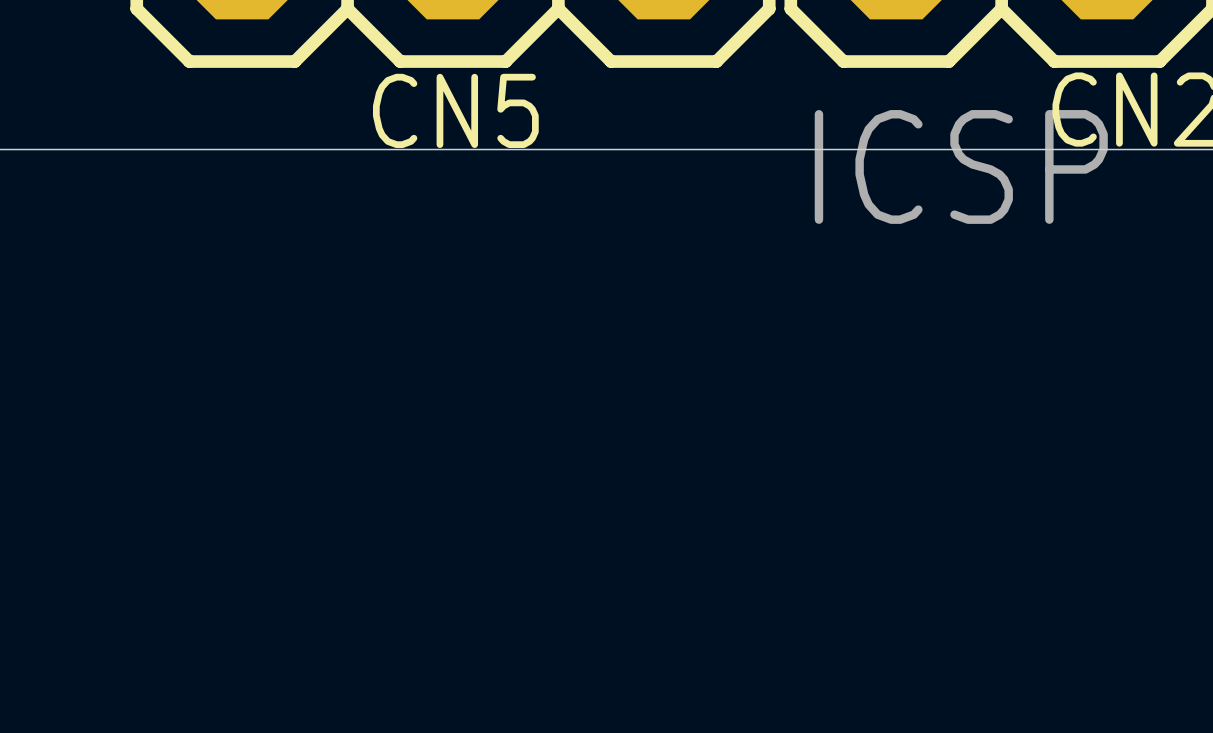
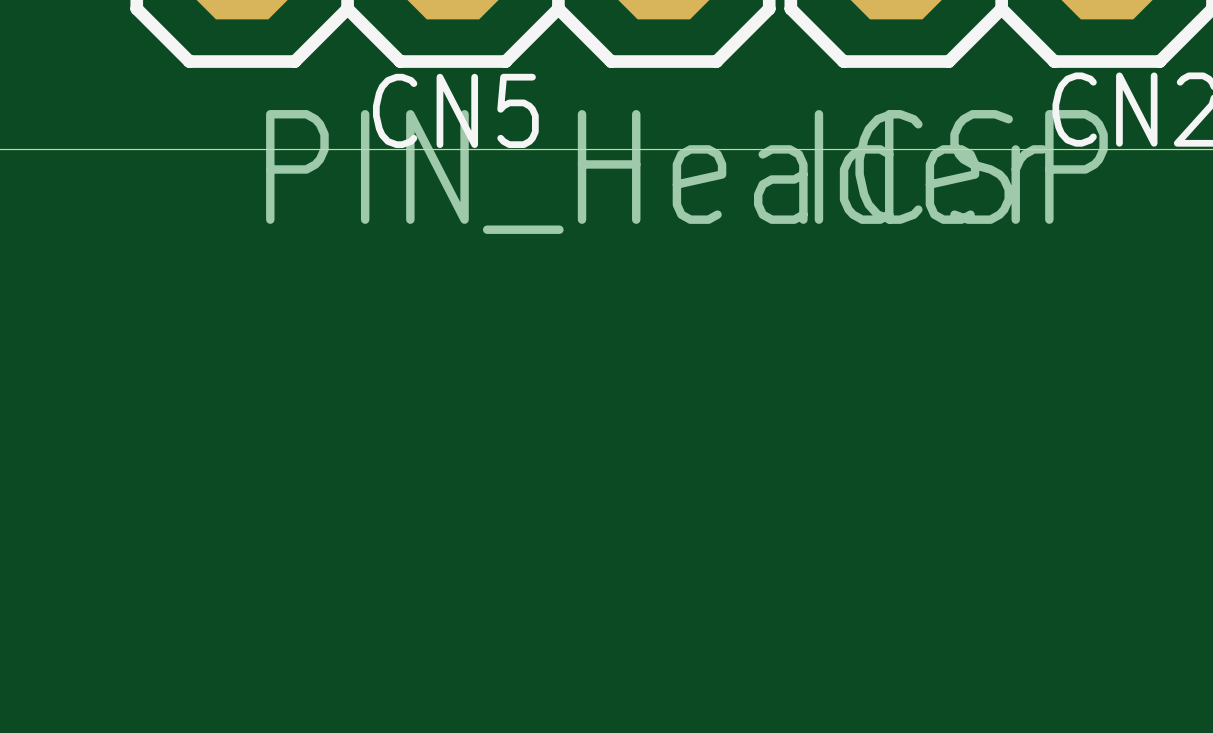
CN5 value: none -> PIN_Header (656, 171)

